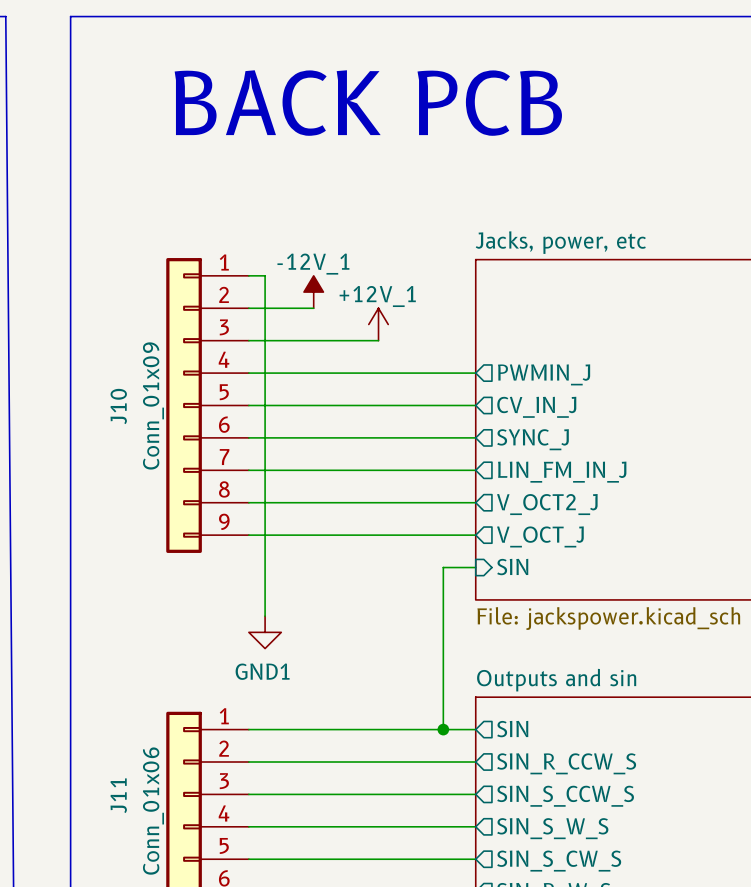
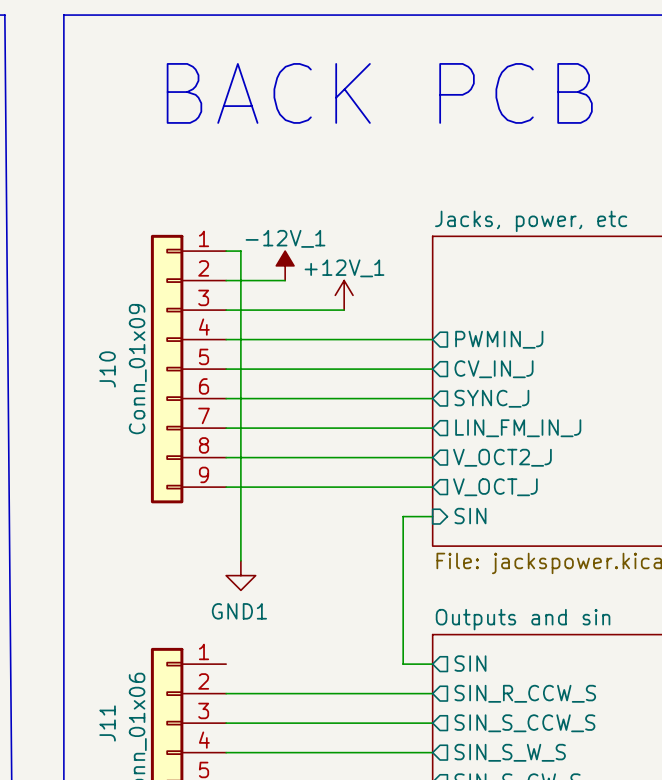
wire: (248, 729) (443, 729) -> none
junction: (443, 729) -> none

